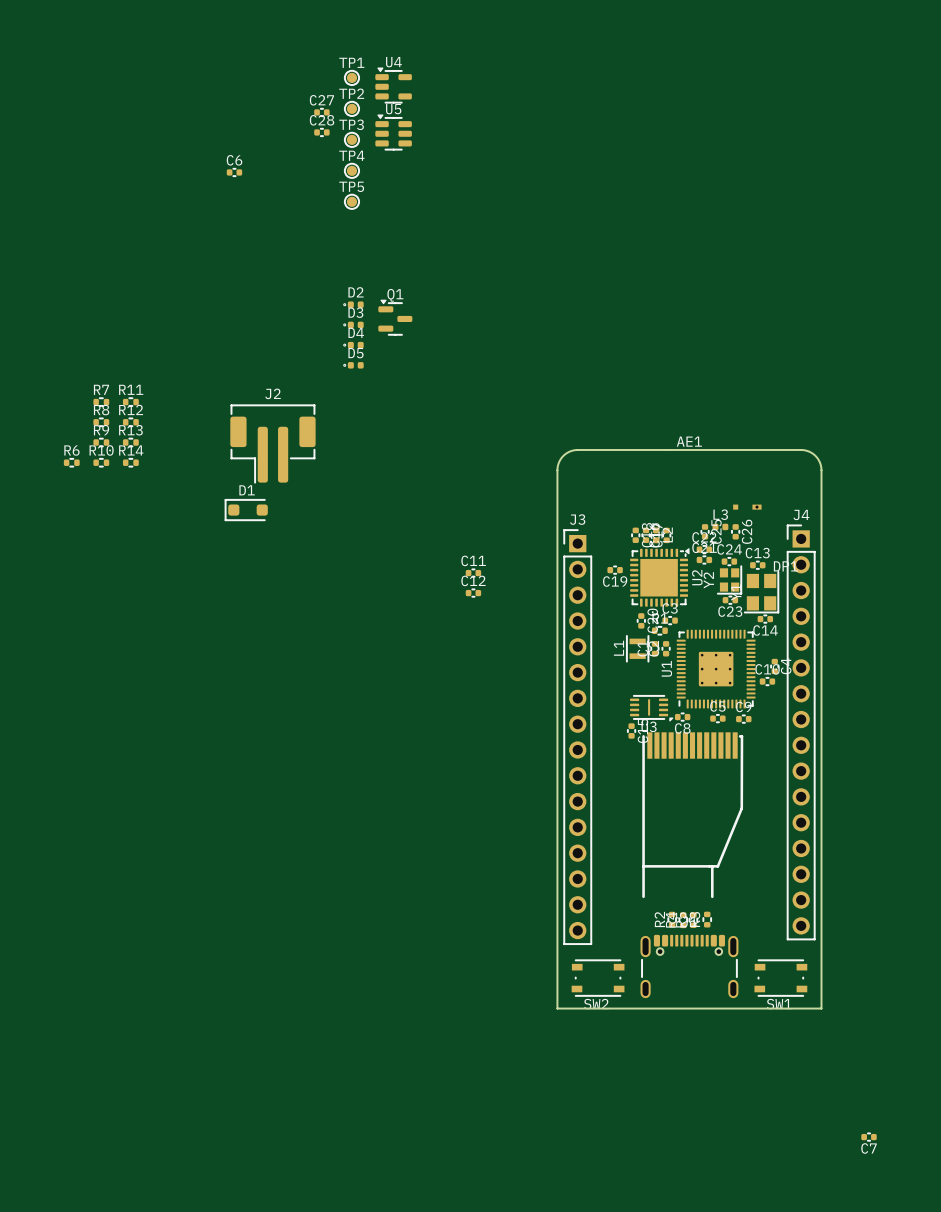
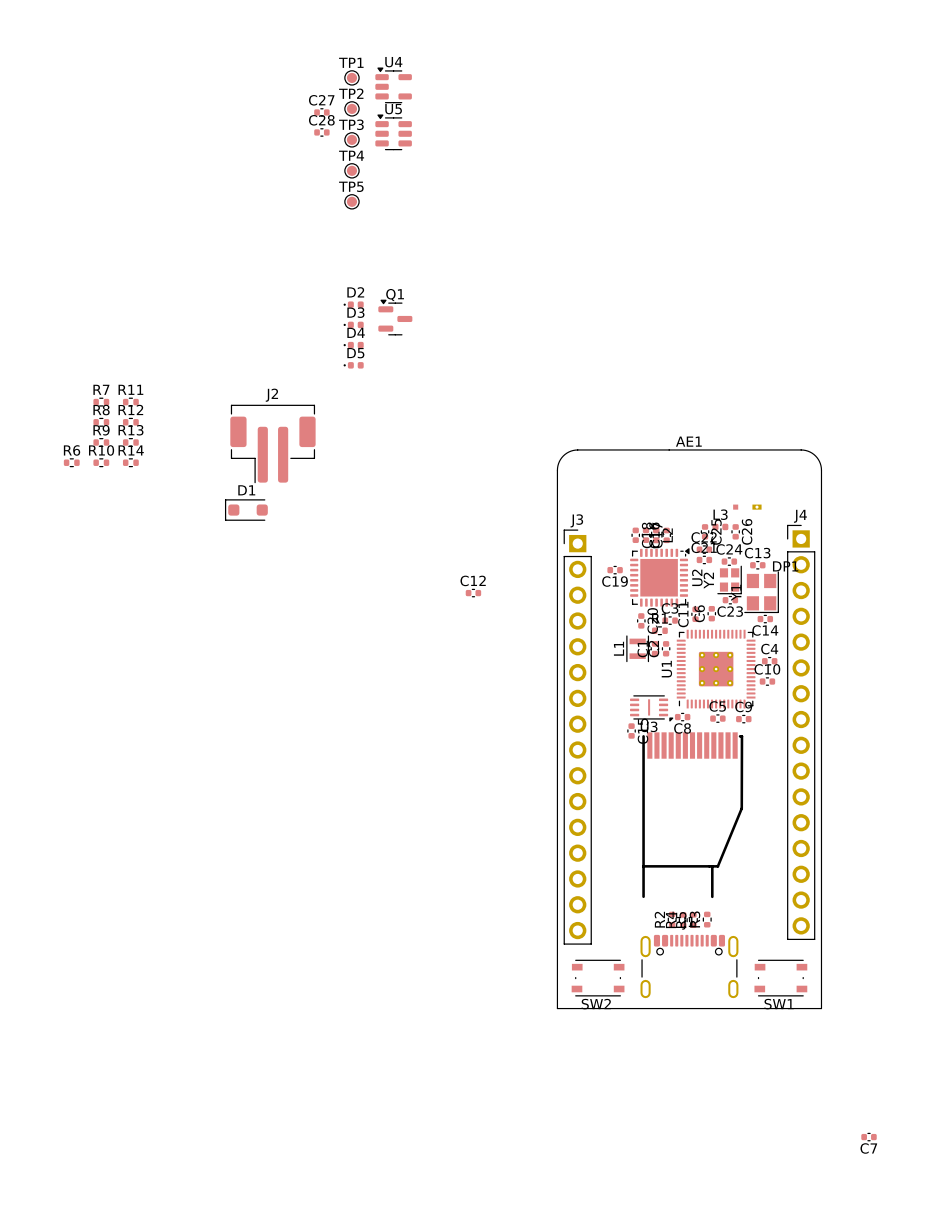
C6 rotation: 0° (234, 172) -> 90° clockwise (711, 613)
C6 position: (234, 172) -> (711, 613)
C11 rotation: 0° (473, 573) -> 90° clockwise (695, 614)
C11 position: (473, 573) -> (695, 614)
C4 rotation: 0° (774, 666) -> 90° clockwise (769, 661)

